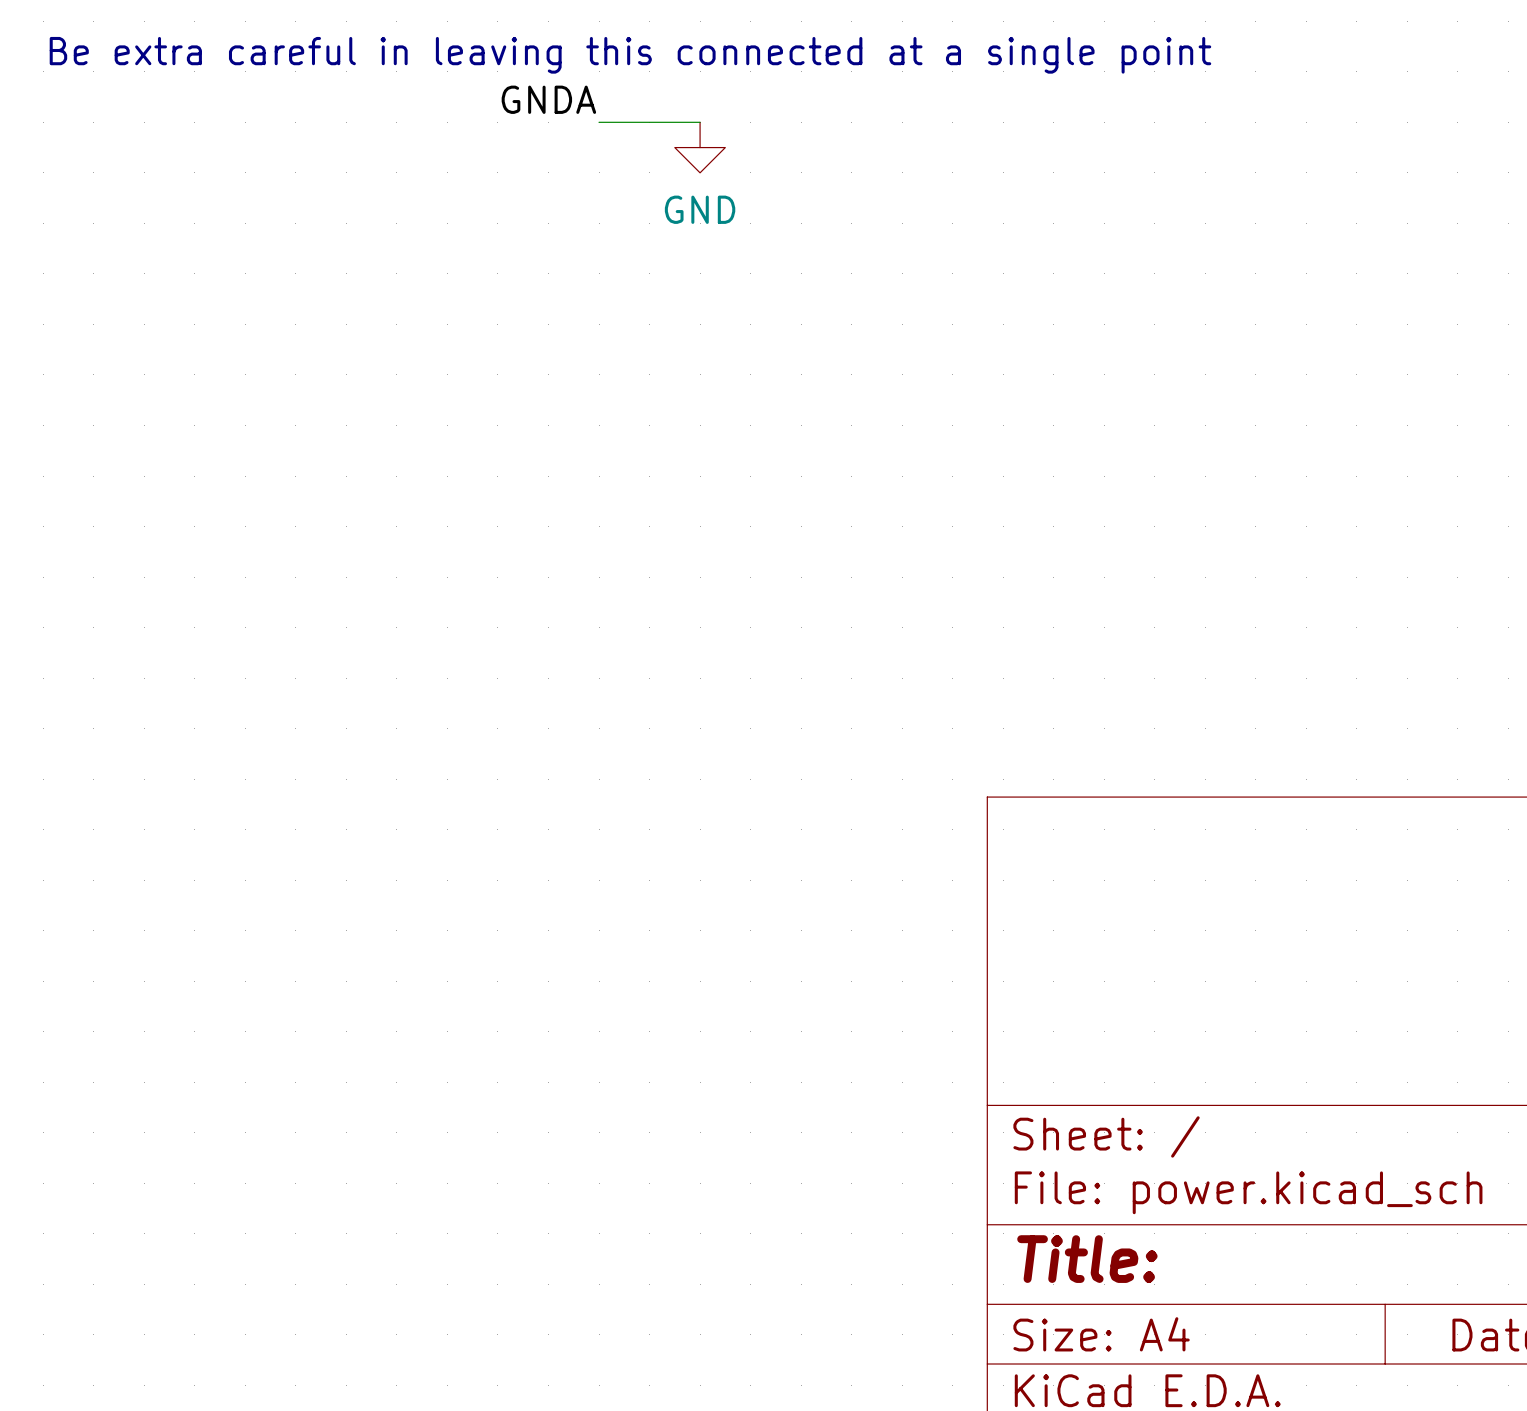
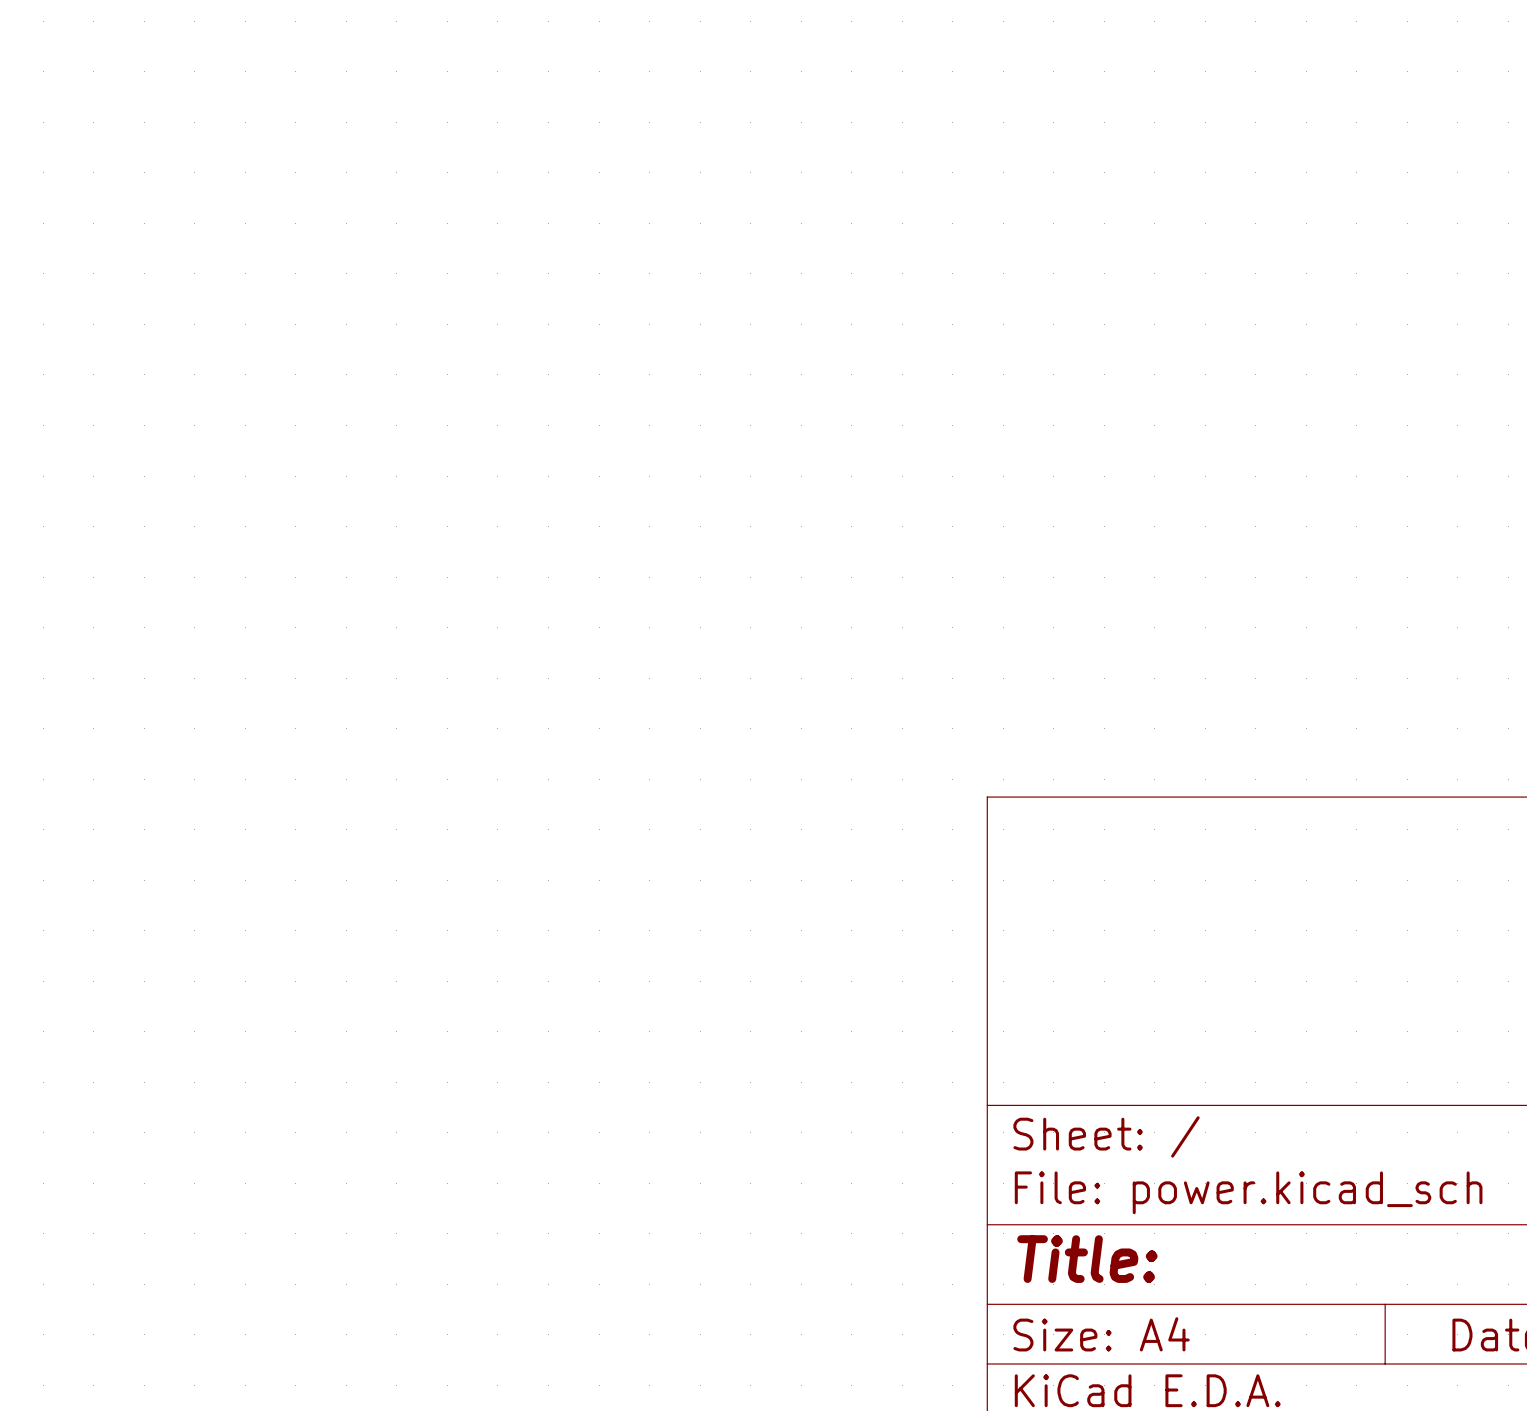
text: Be extra careful in leaving this connected at a single point (630, 55) -> none
label: GNDA (548, 99) -> none
wire: (599, 122) (700, 122) -> none
power symbol: GND (700, 147) -> none

